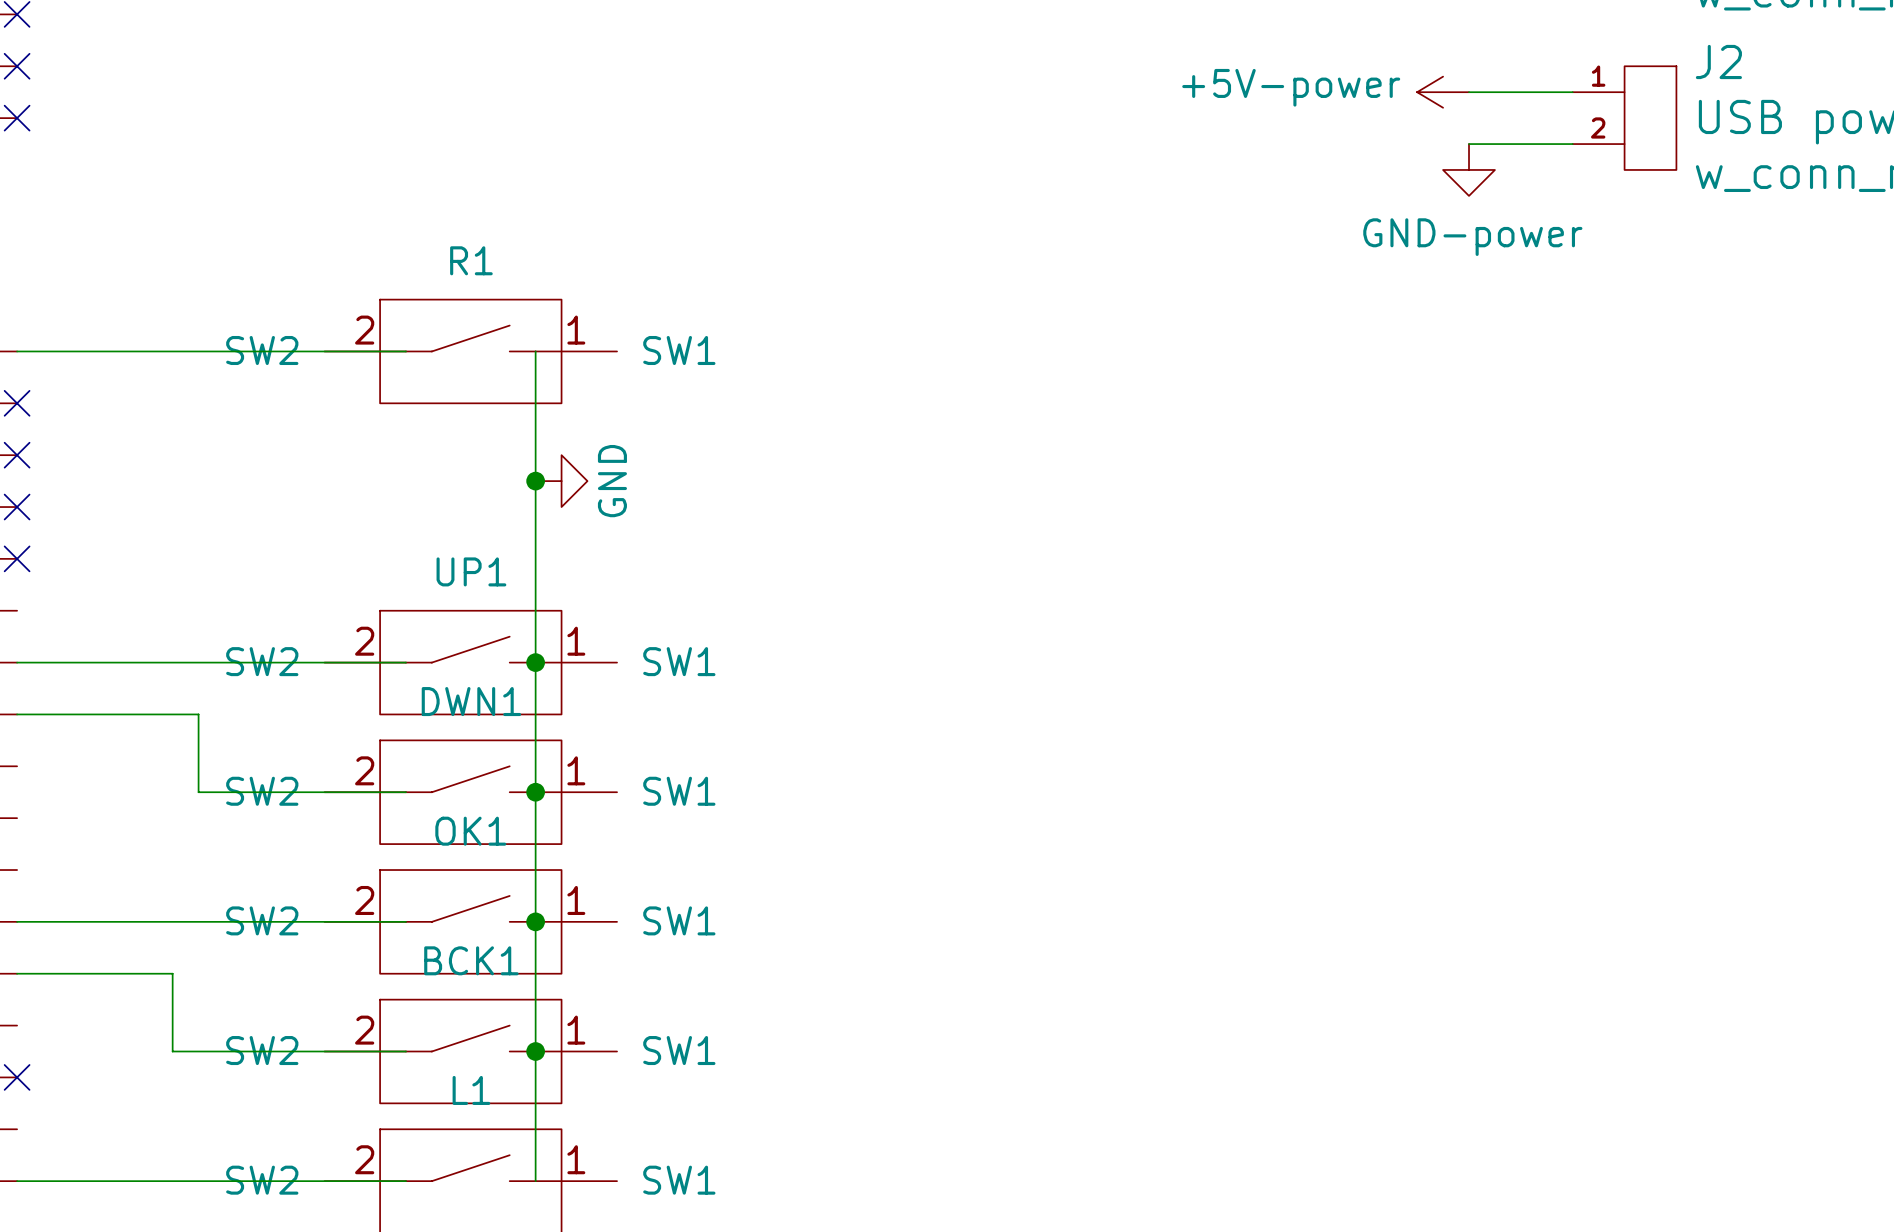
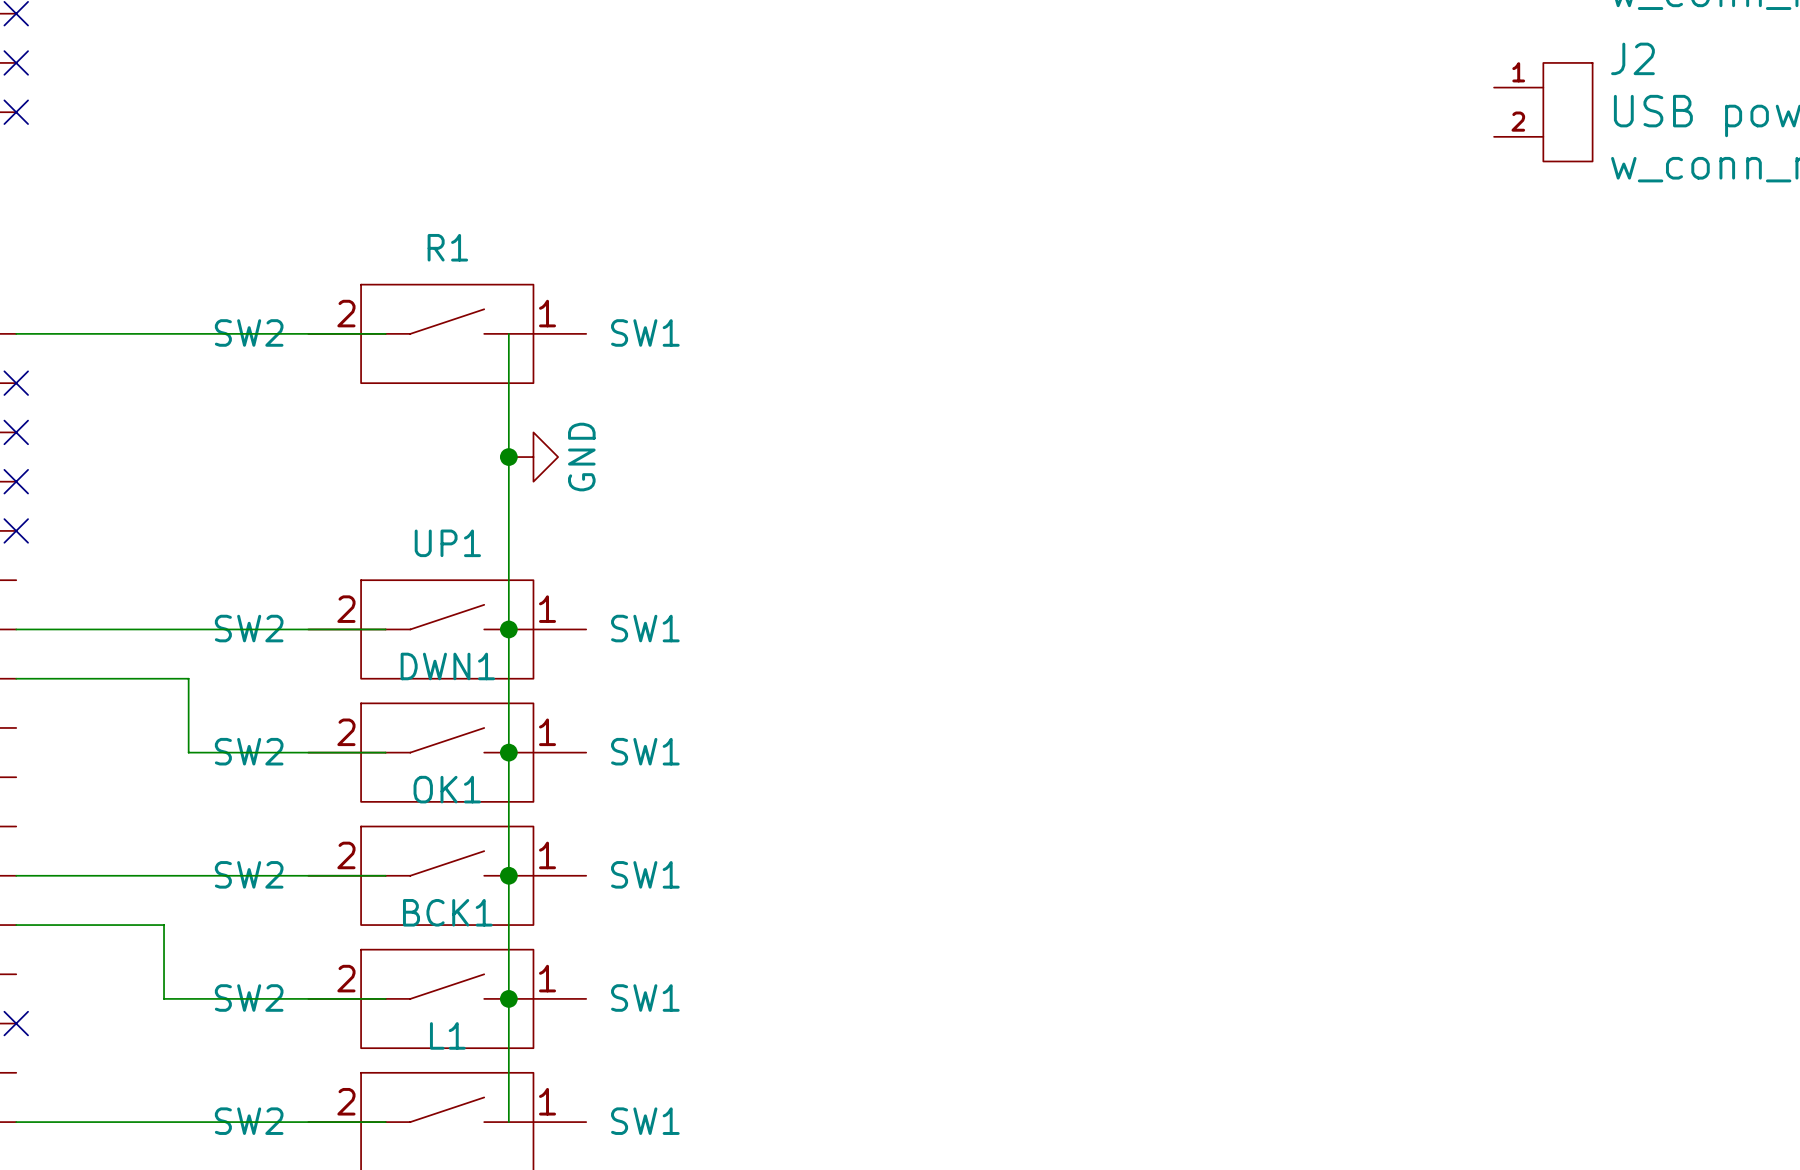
power symbol: +5V-power (1443, 92) -> none
wire: (1469, 92) (1572, 92) -> none
wire: (1469, 144) (1572, 144) -> none
power symbol: GND-power (1469, 169) -> none

